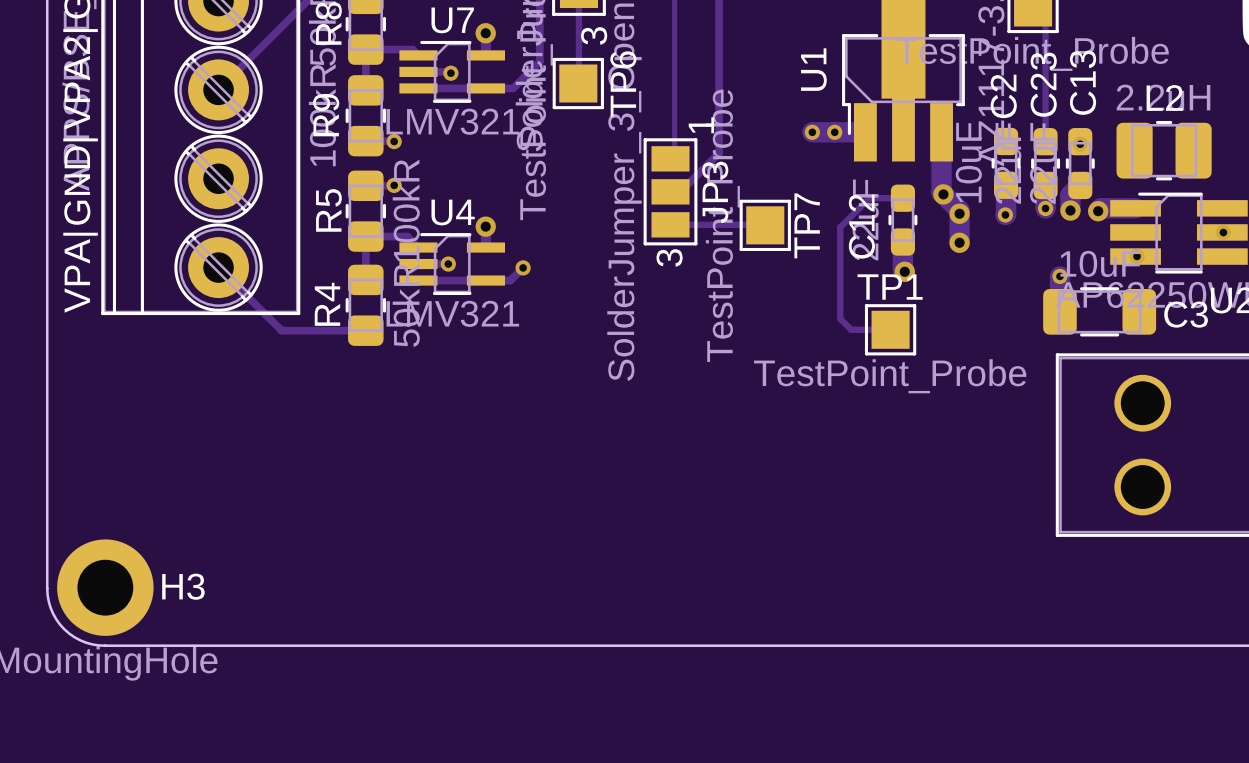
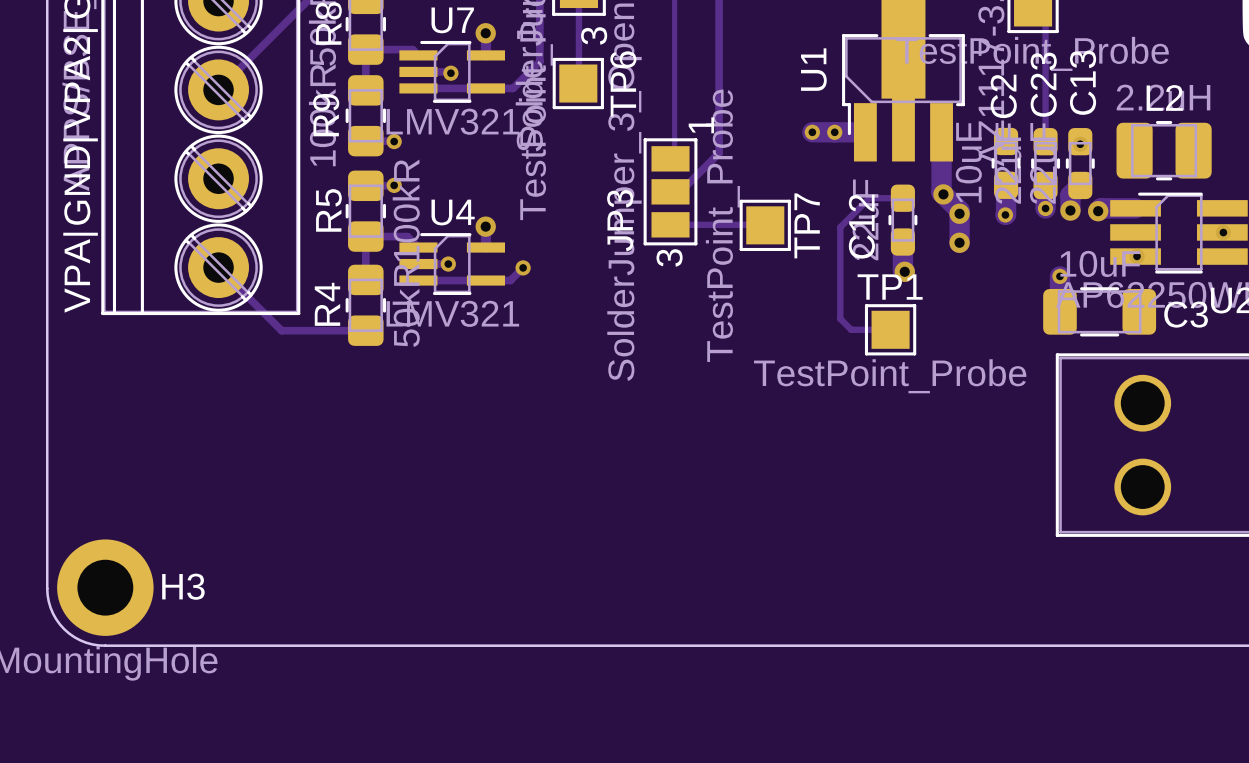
JP3 name position: JP3 (715, 192) -> JP3 (620, 220)

